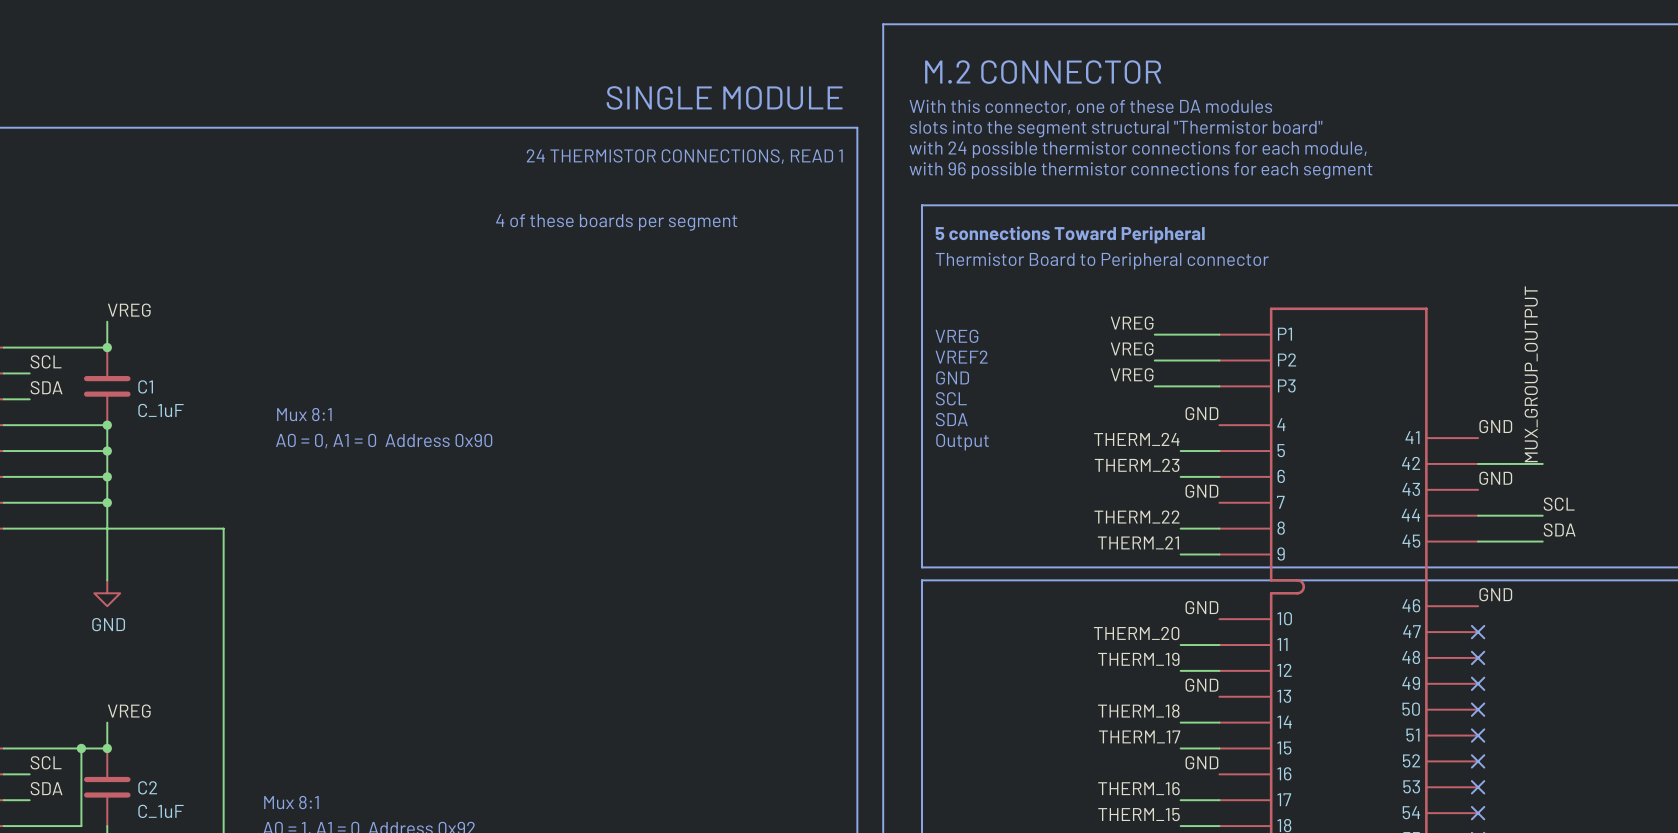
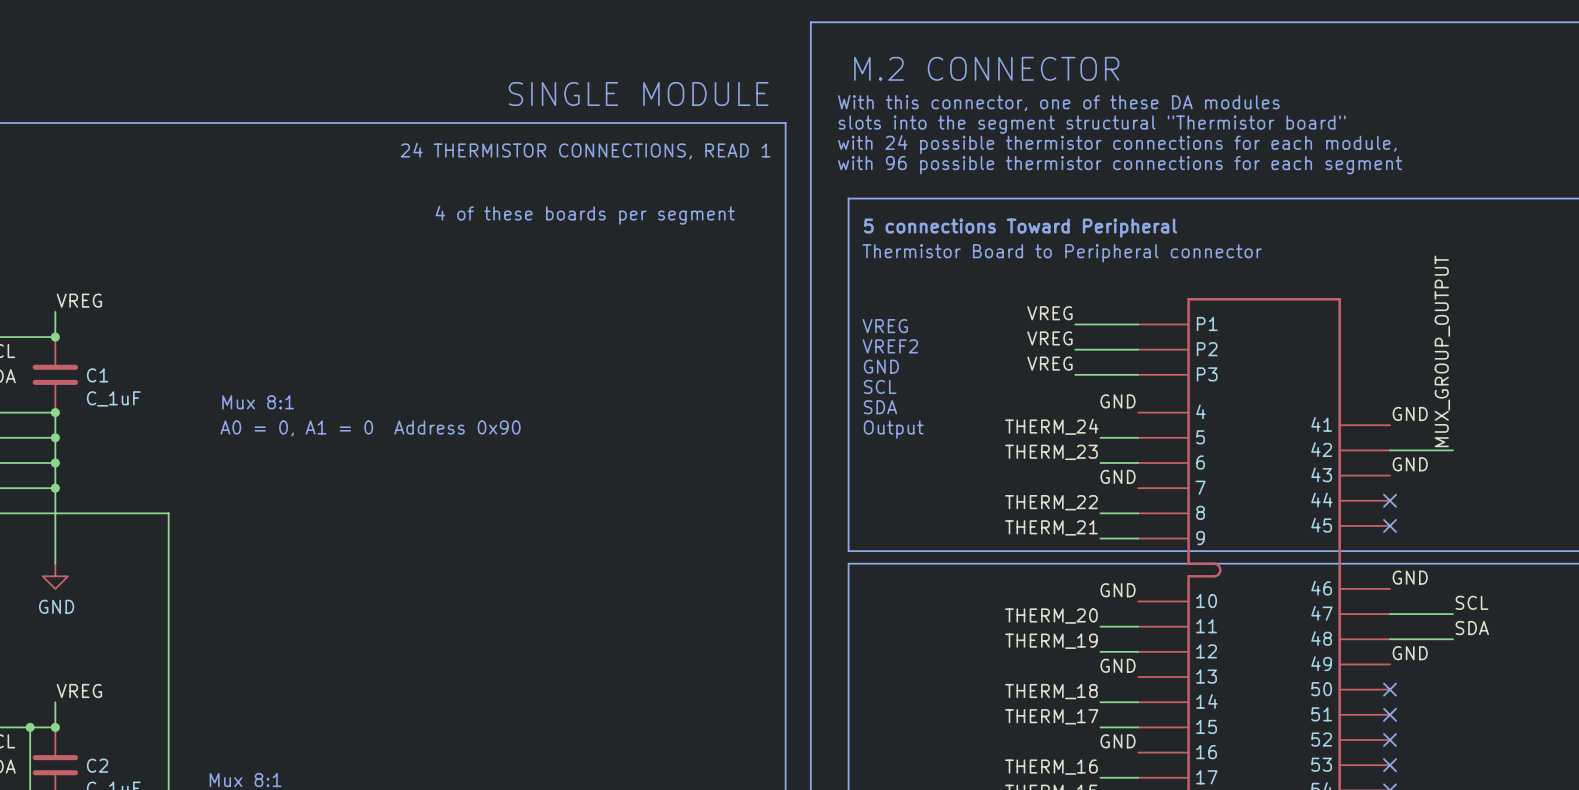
label position: SCL (1559, 504) -> SCL (1471, 602)
wire: (1478, 515) (1542, 515) -> (1390, 614) (1452, 614)
no-connect mark: none -> (1390, 500)
label position: SDA (1559, 530) -> SDA (1472, 628)
wire: (1478, 541) (1542, 541) -> (1390, 639) (1452, 639)
no-connect mark: none -> (1390, 525)
no-connect mark: (1478, 632) -> none
no-connect mark: (1478, 657) -> none
label: none -> GND (1410, 653)
no-connect mark: (1478, 683) -> none

